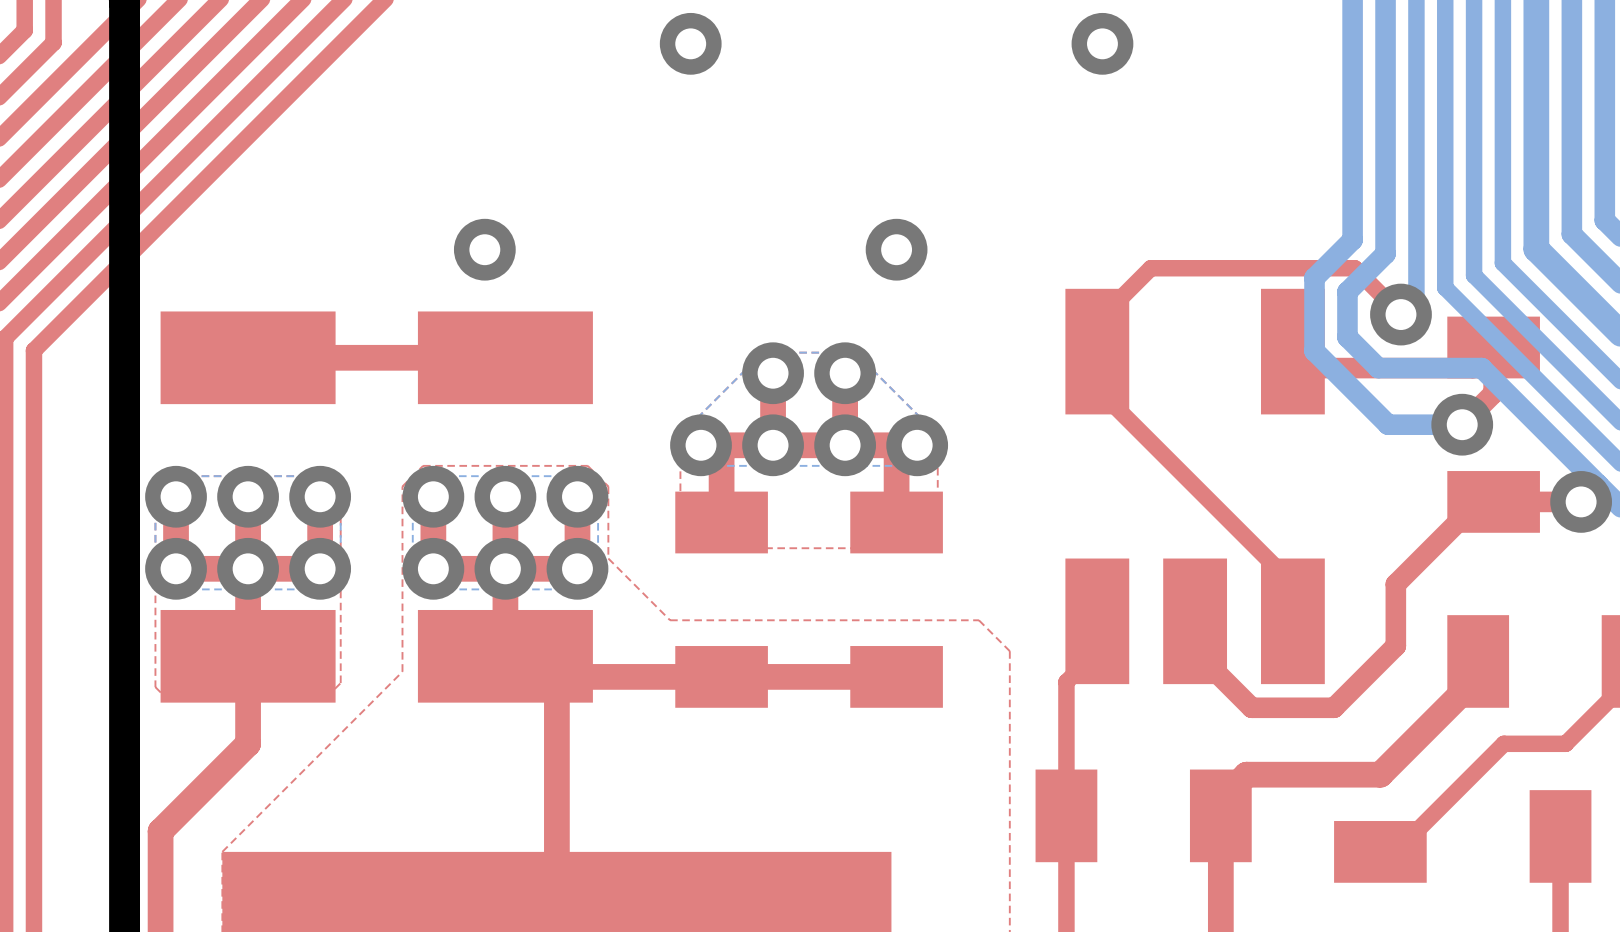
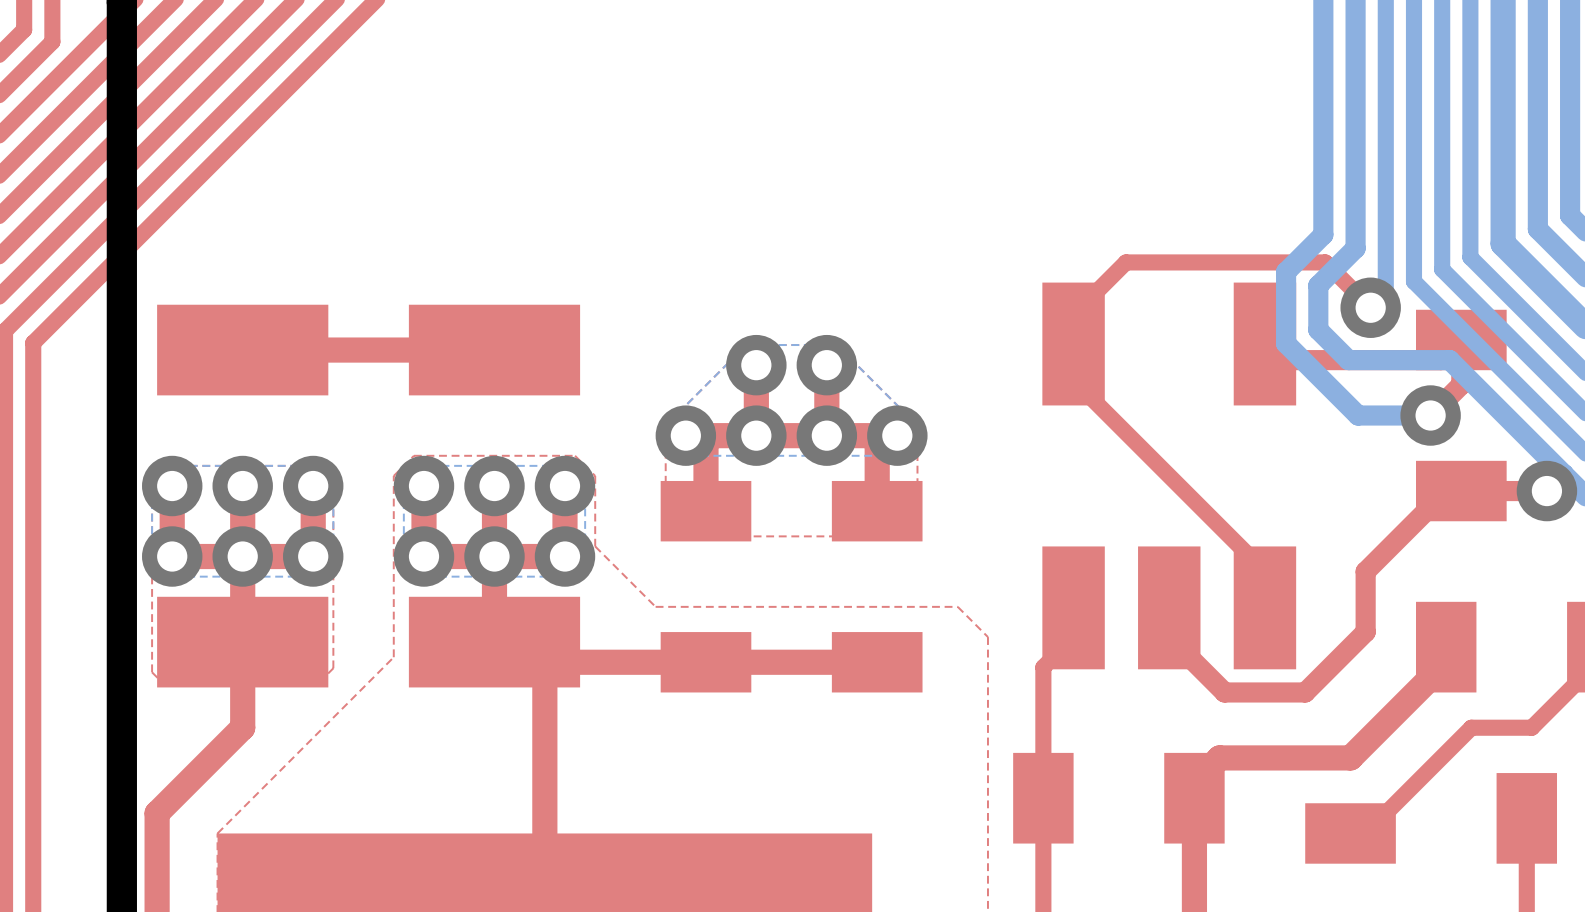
via: (690, 43) -> none
via: (1102, 43) -> none
via: (484, 249) -> none
via: (896, 249) -> none

